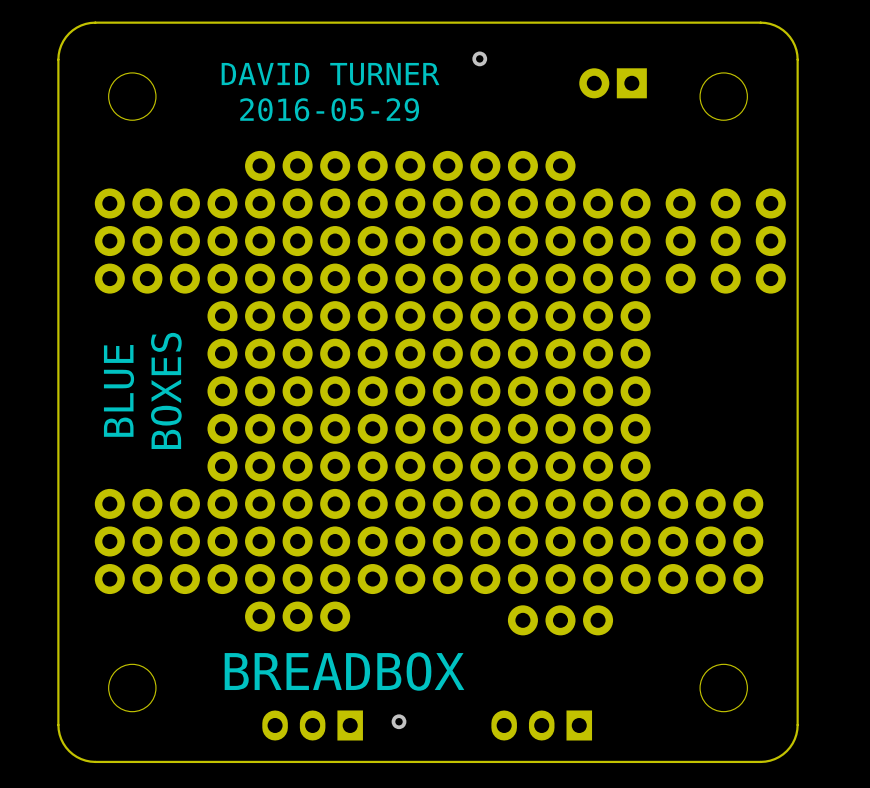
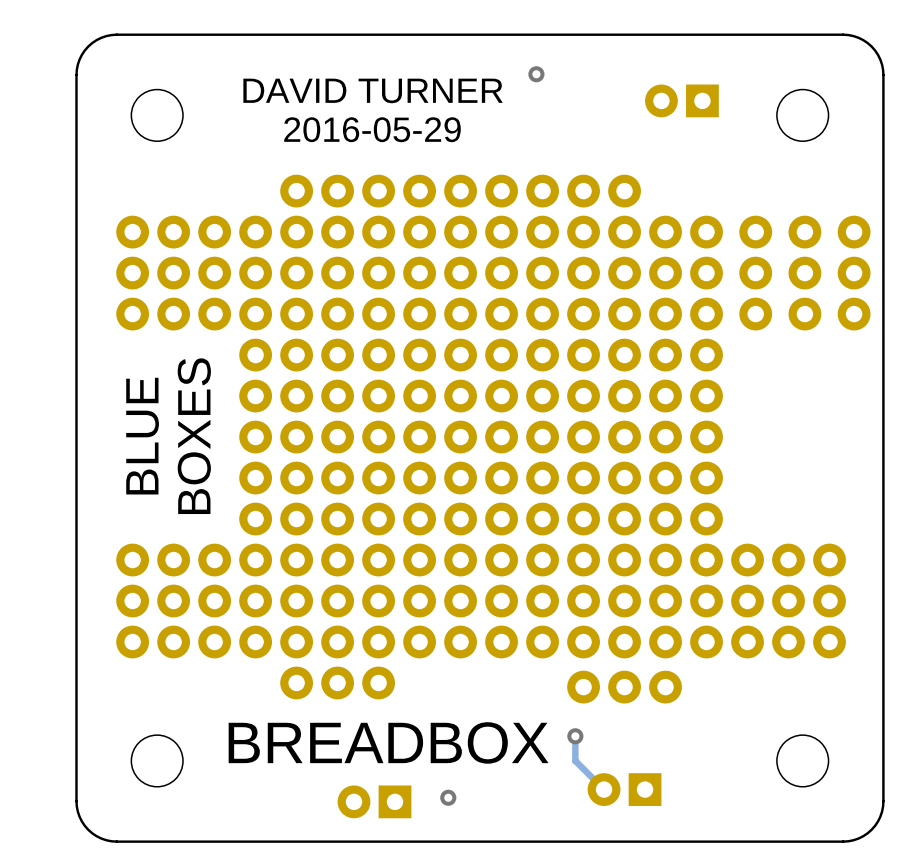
track: none -> (575, 736) (575, 760) (604, 789)
via: none -> (575, 736)
part: none -> (624, 789)
part: (312, 725) -> none
part: none -> (374, 801)
part: (541, 725) -> none

